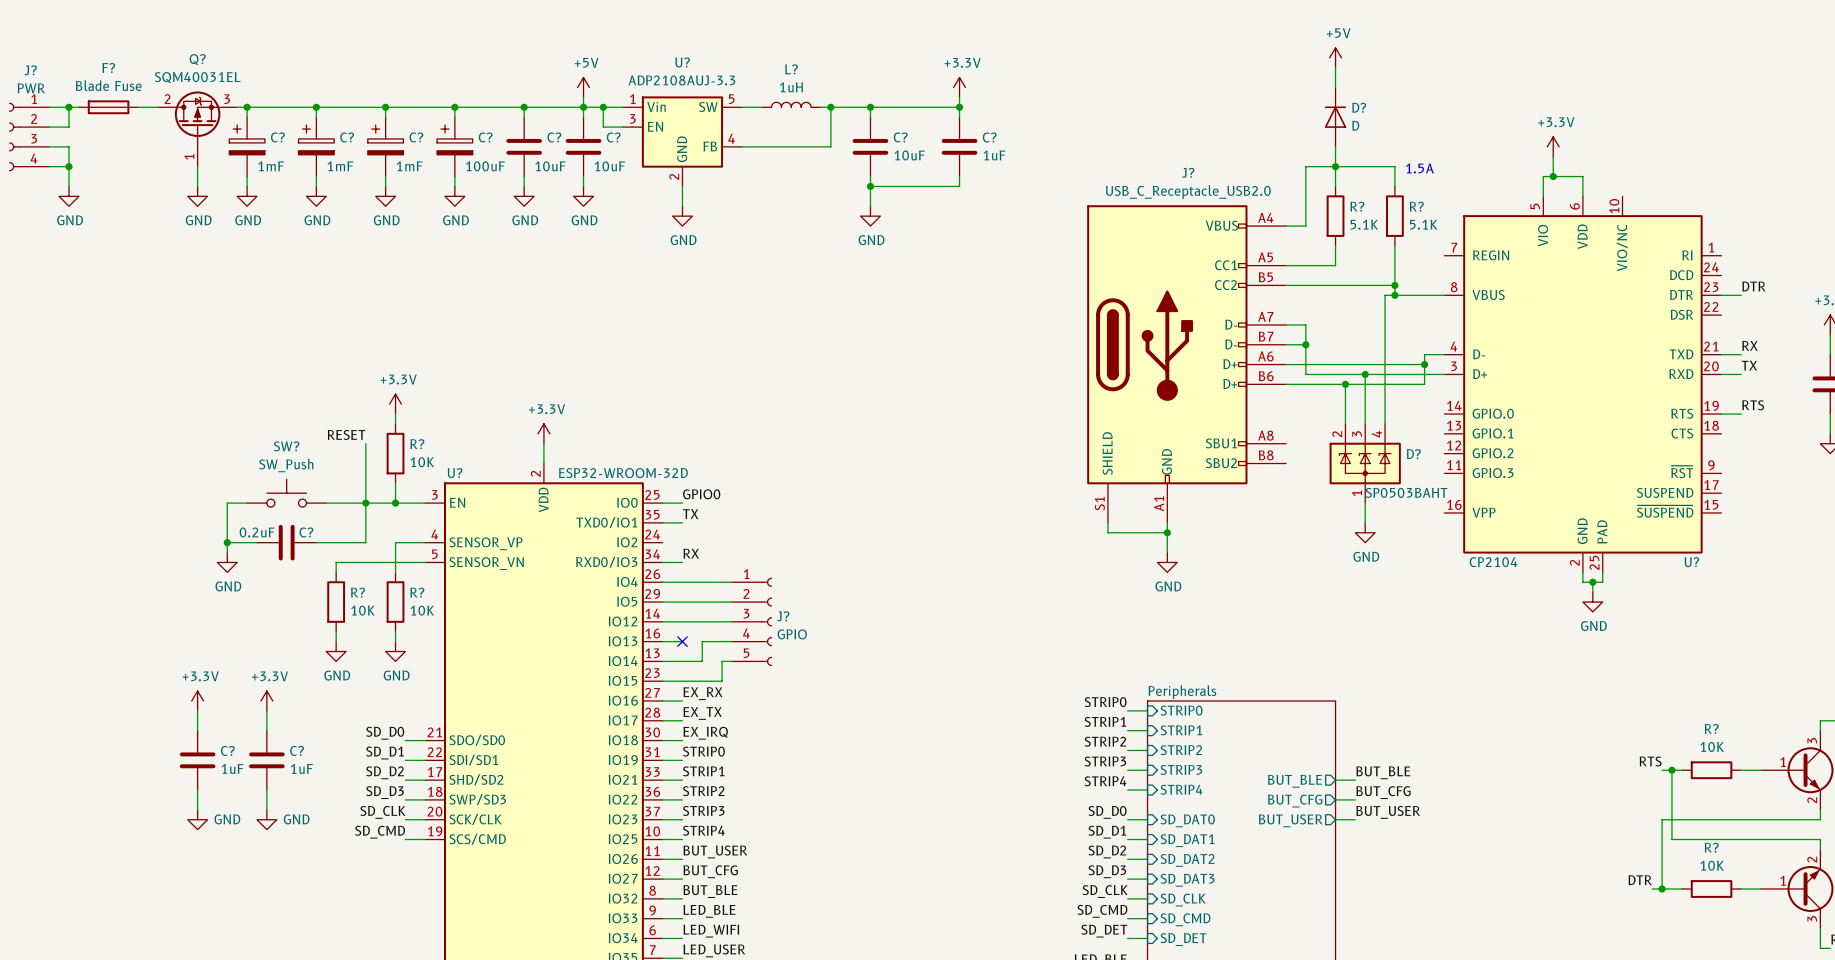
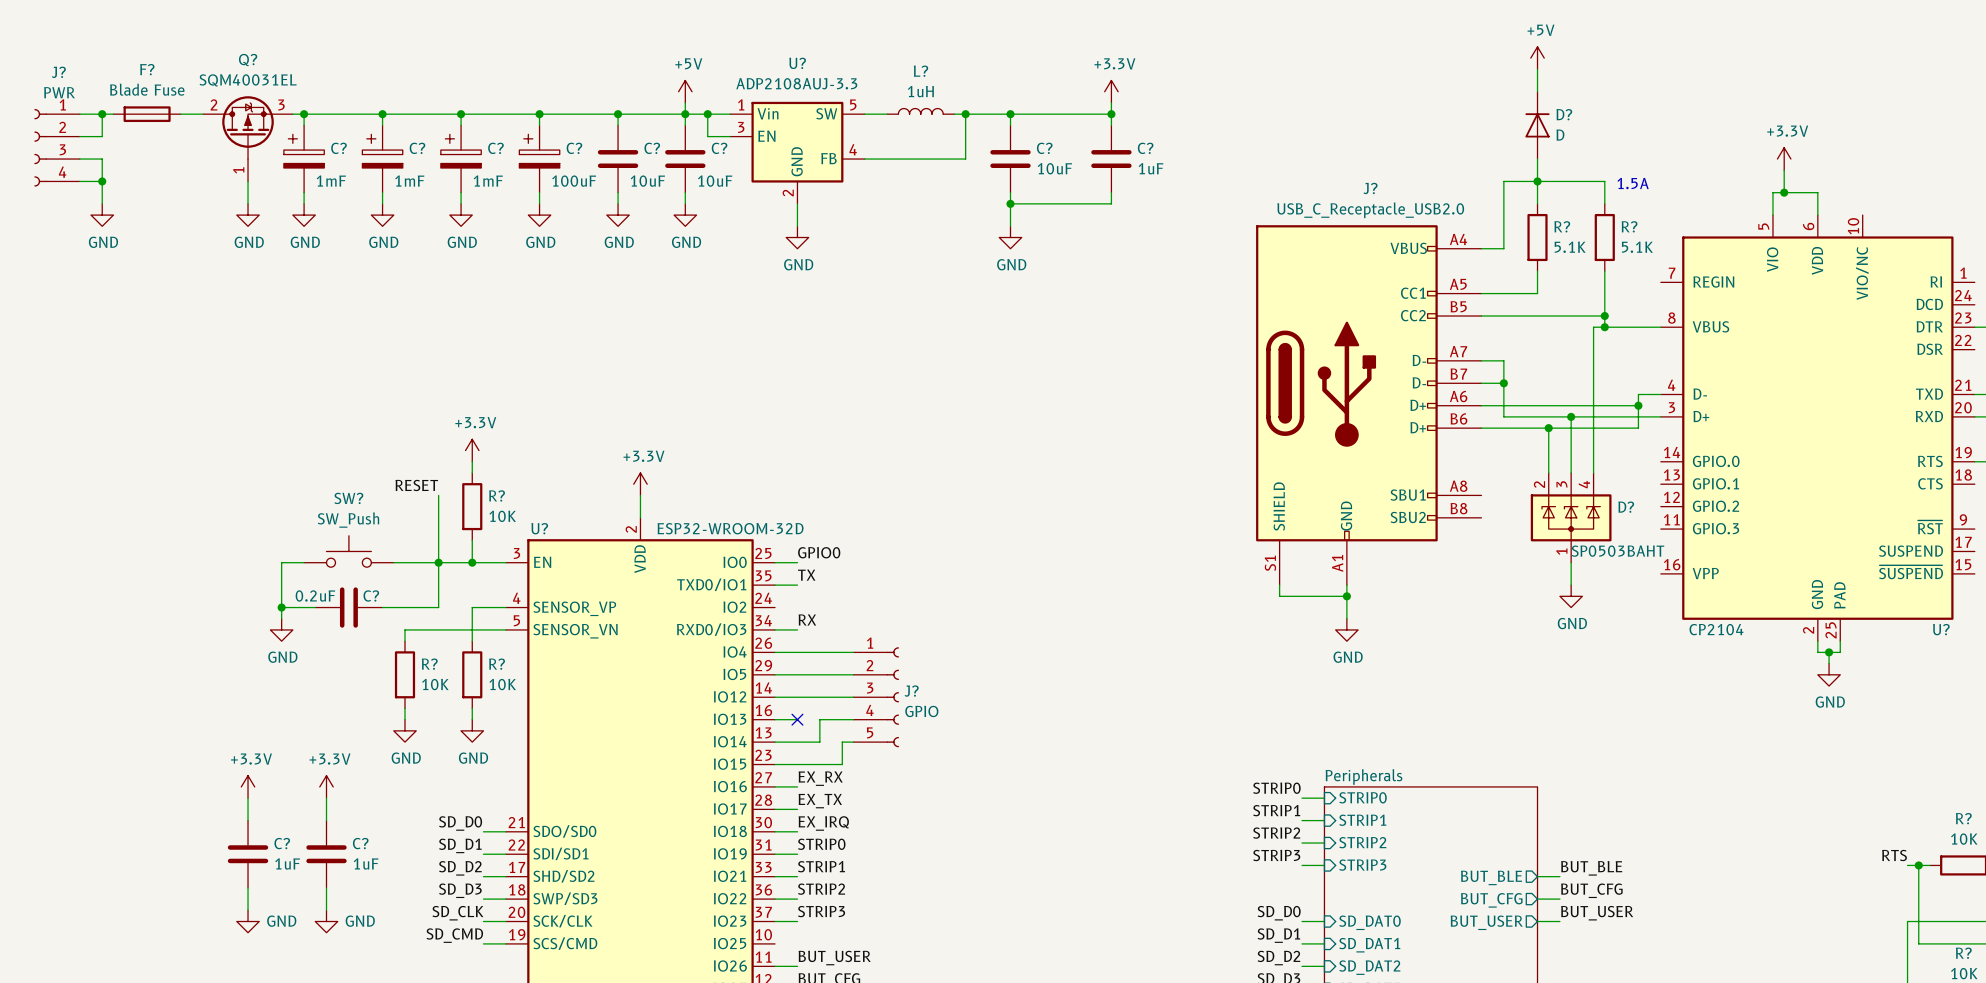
label: STRIP4 (1105, 781) -> none
sheet pin: STRIP4 (1181, 789) -> none
wire: (1127, 790) (1147, 790) -> none
label: STRIP4 (703, 830) -> none
wire: (662, 839) (682, 839) -> none

